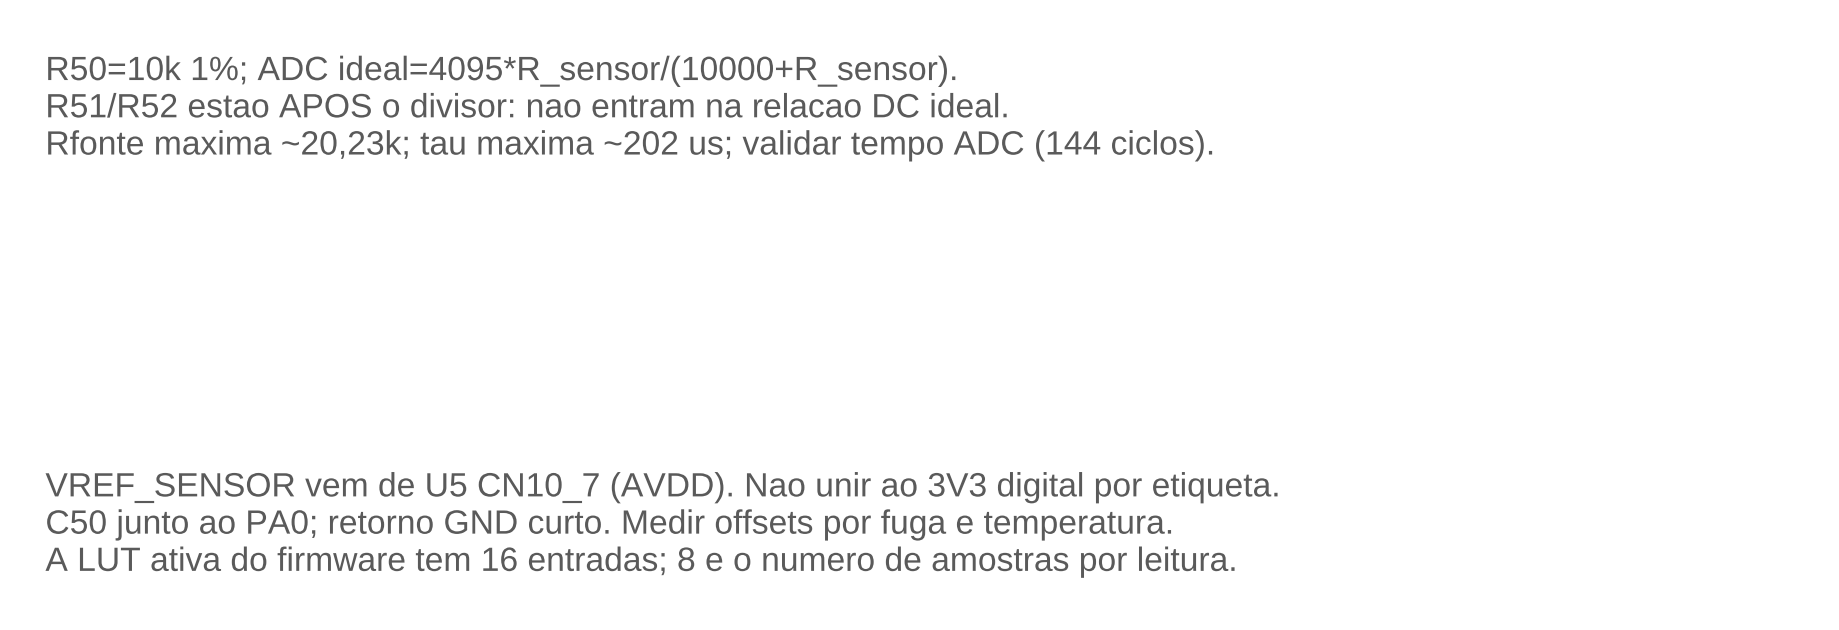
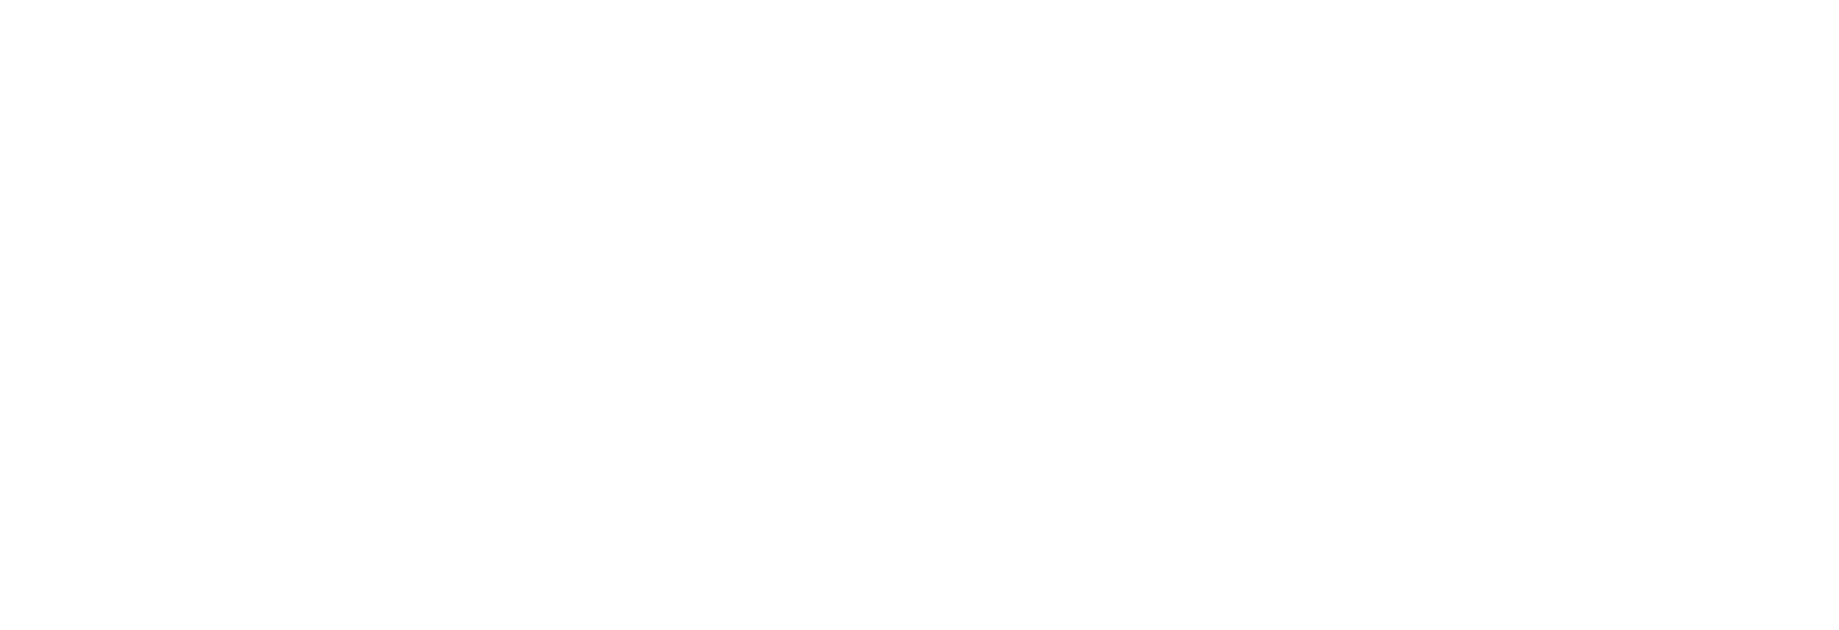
text: R50=10k 1%; ADC ideal=4095*R_sensor/(10000+R_sensor). (501, 71) -> none
text: R51/R52 estao APOS o divisor: nao entram na relacao DC ideal. (527, 105) -> none
text: Rfonte maxima ~20,23k; tau maxima ~202 us; validar tempo ADC (144 ciclos). (630, 145) -> none
text: VREF_SENSOR vem de U5 CN10_7 (AVDD). Nao unir ao 3V3 digital por etiqueta. (661, 487) -> none
text: C50 junto ao PA0; retorno GND curto. Medir offsets por fuga e temperatura. (609, 524) -> none
text: A LUT ativa do firmware tem 16 entradas; 8 e o numero de amostras por leitura. (640, 562) -> none

